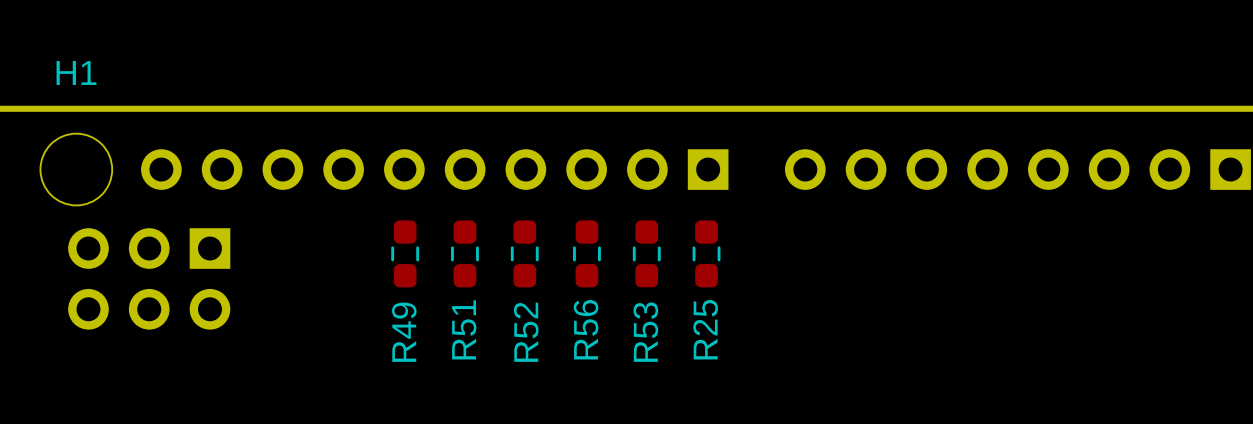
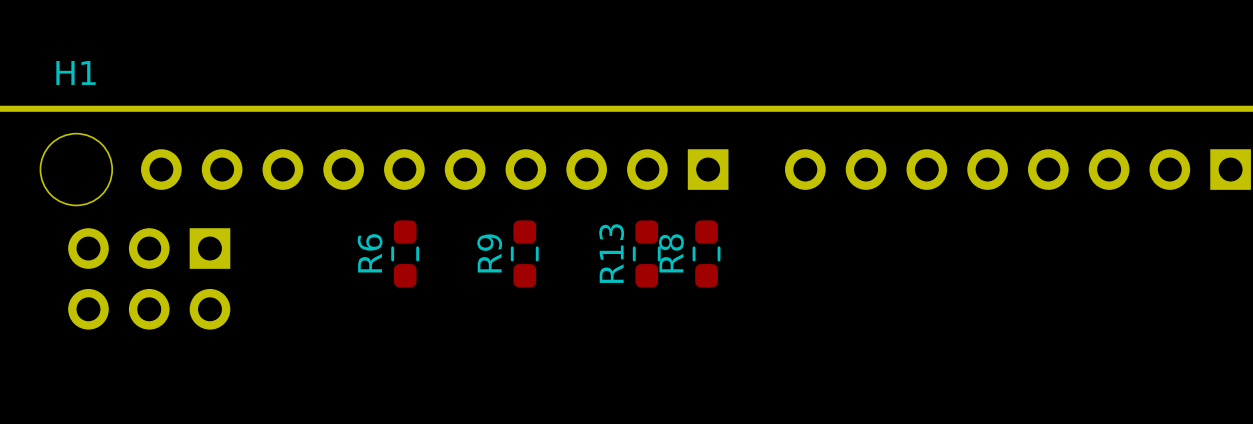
R51: (464, 253) -> none
R56: (586, 253) -> none
R25 name: R25 (705, 329) -> R8 (671, 253)
R49 name: R49 (404, 332) -> R6 (370, 253)
R52 name: R52 (526, 332) -> R9 (489, 253)
R53 name: R53 (645, 332) -> R13 (611, 253)

